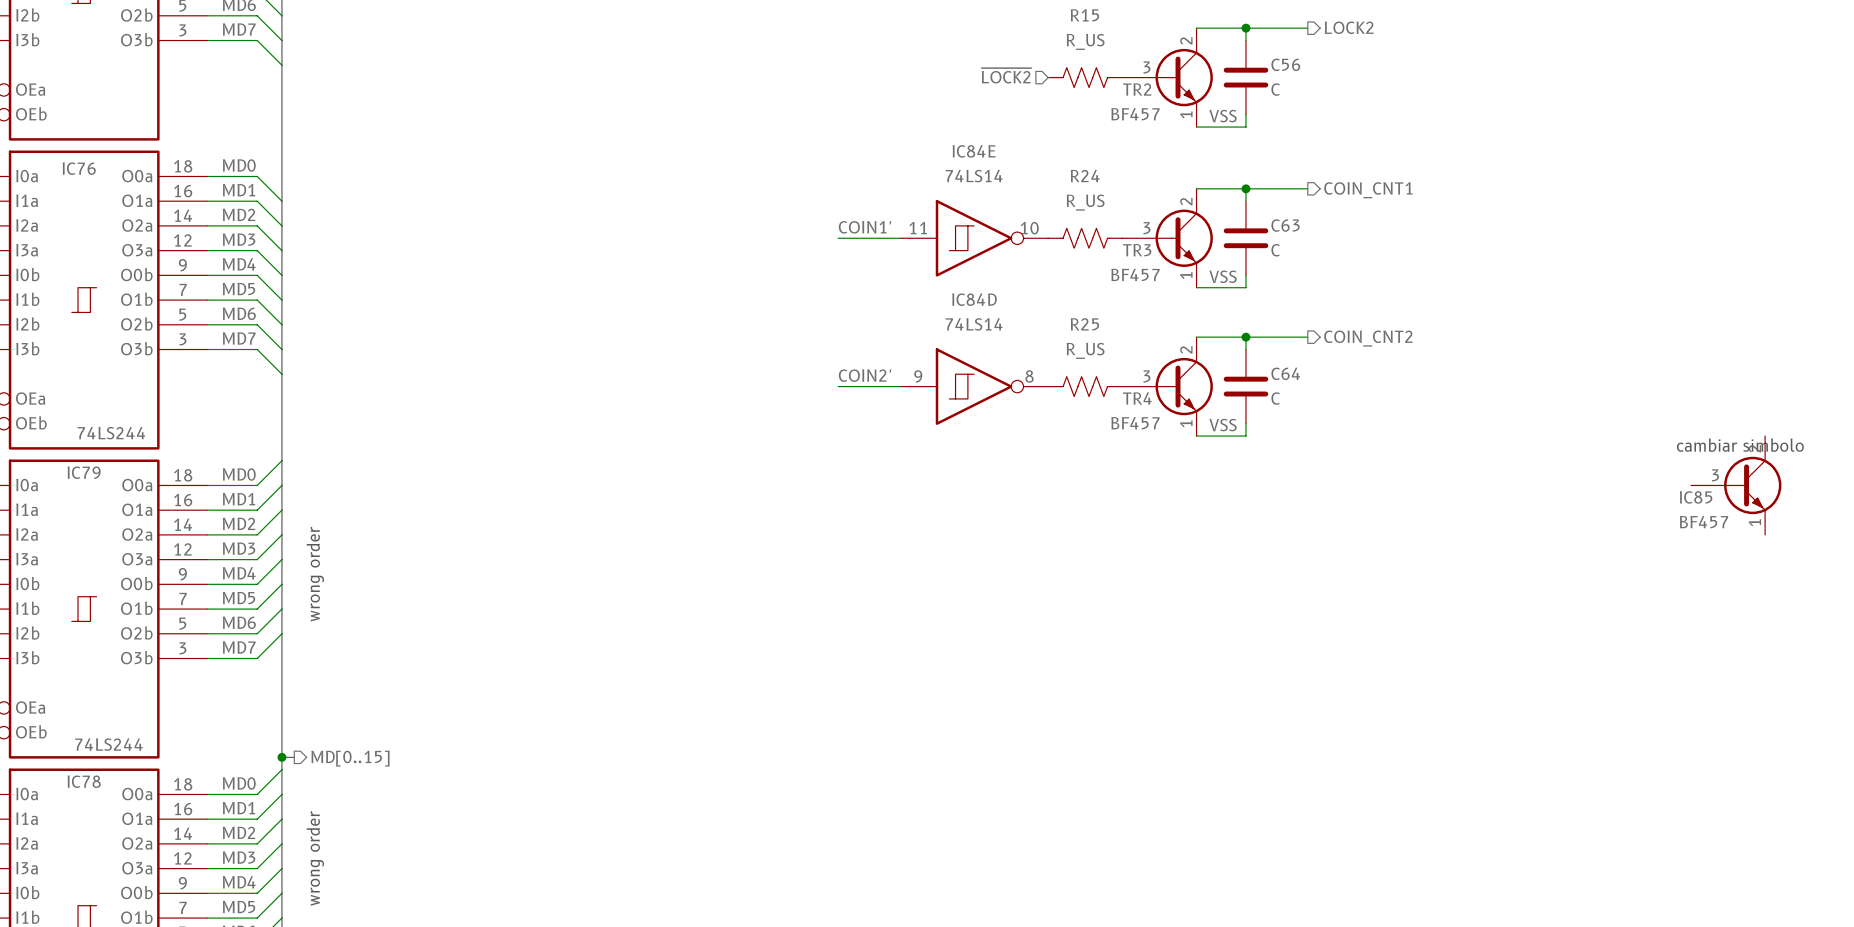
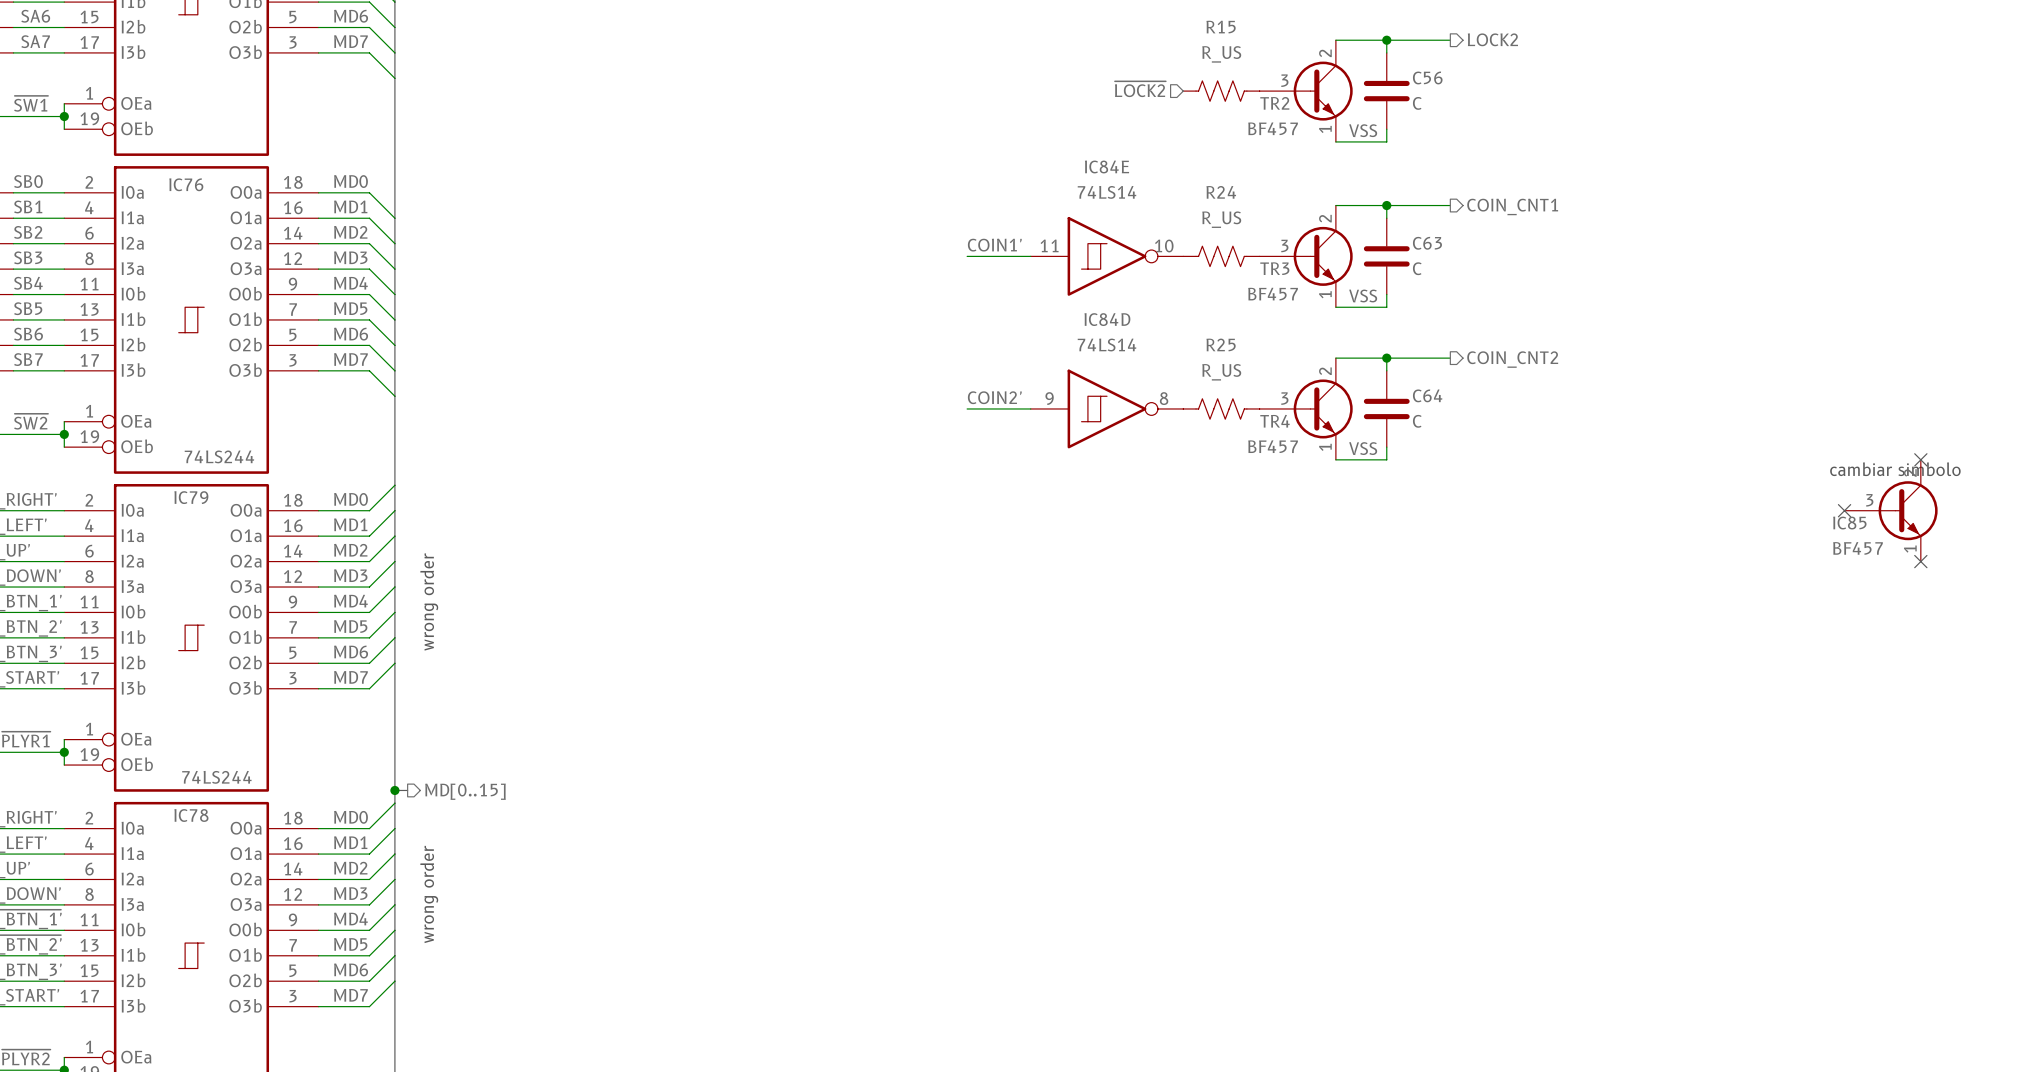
no-connect mark: none -> (1920, 459)
no-connect mark: none -> (1844, 510)
no-connect mark: none -> (1920, 561)

